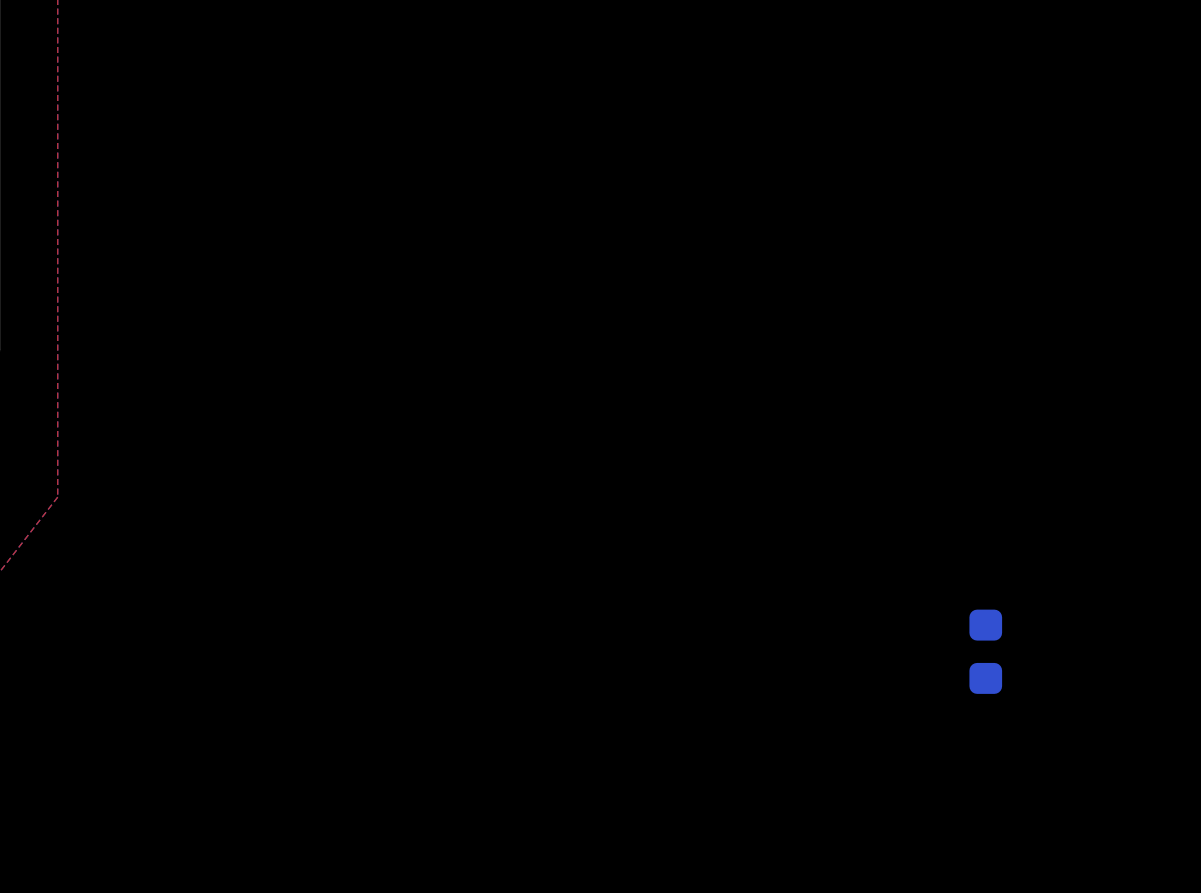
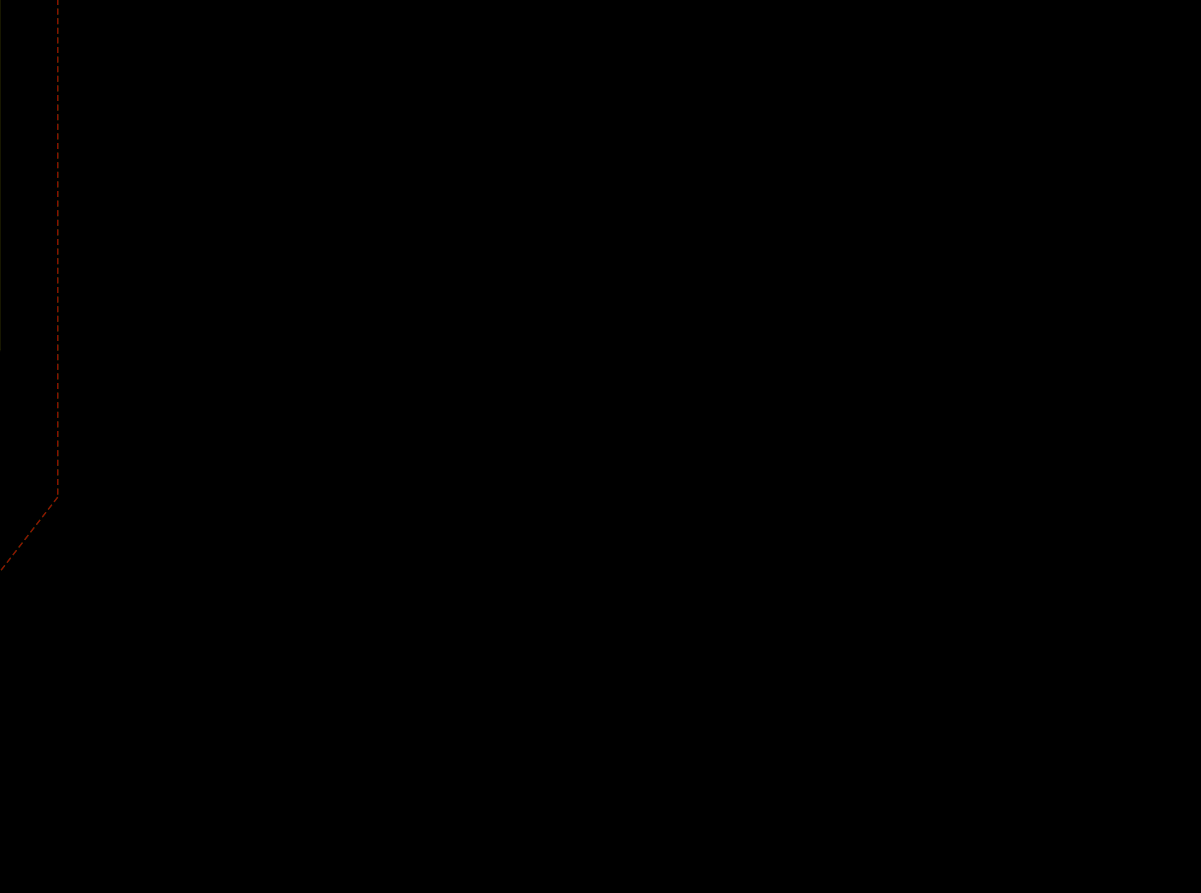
part: (985, 651) -> none

